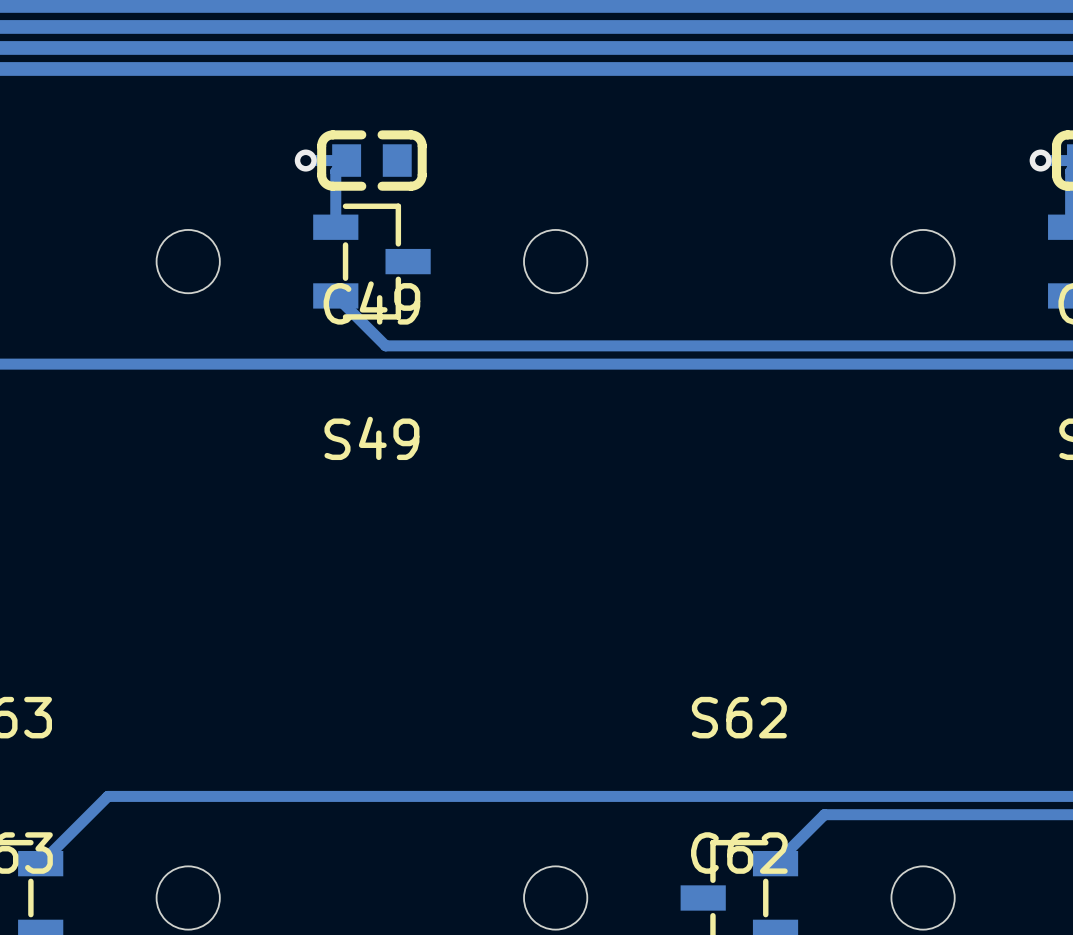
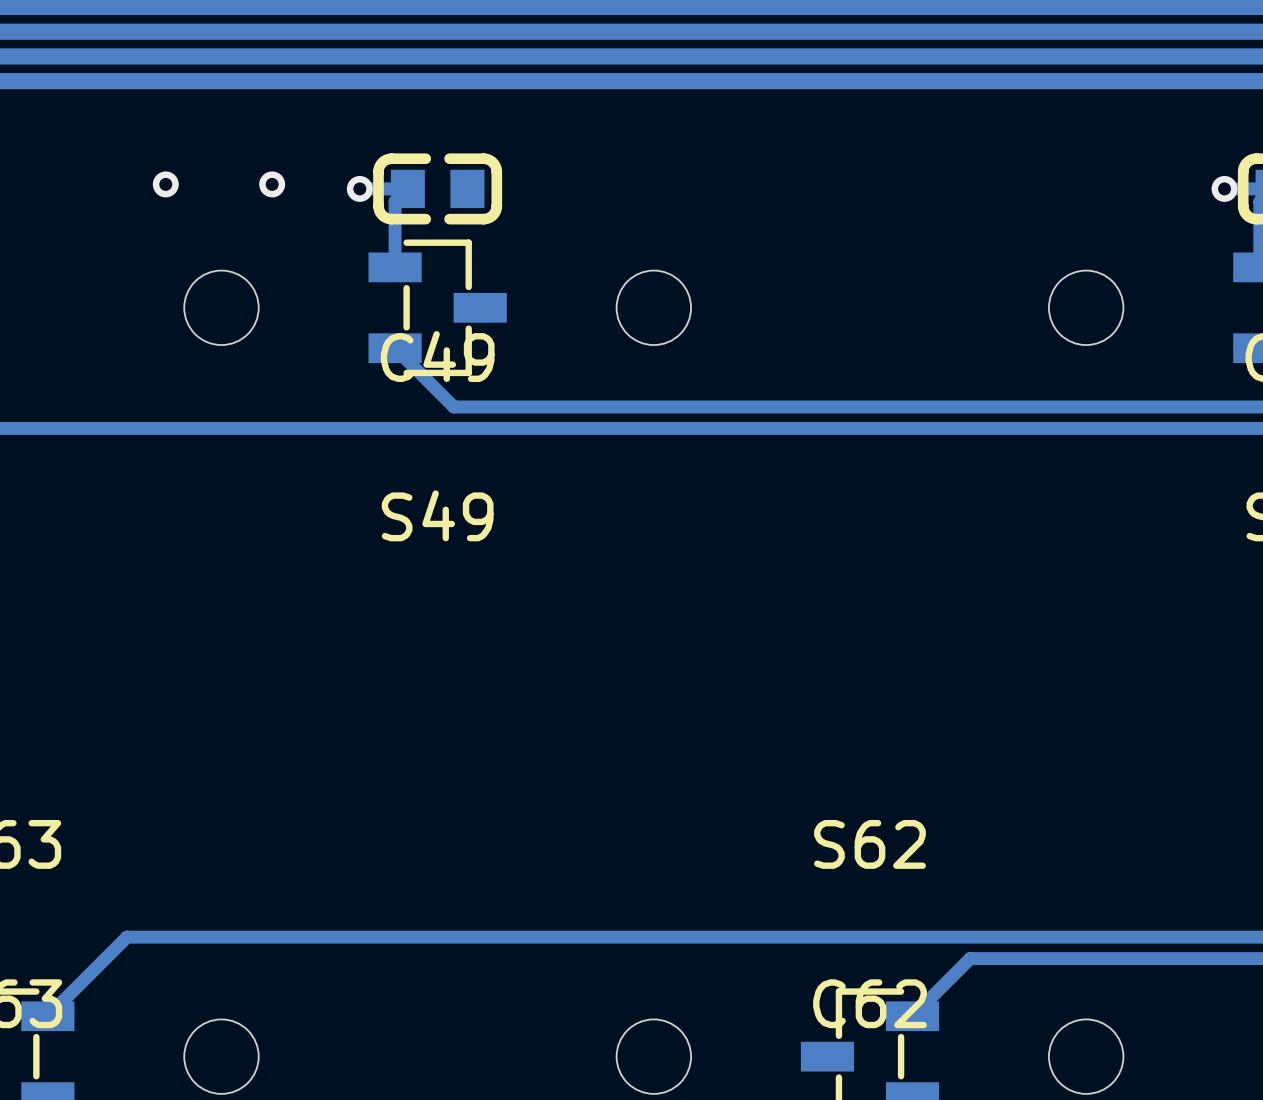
via: none -> (165, 184)
via: none -> (272, 184)

